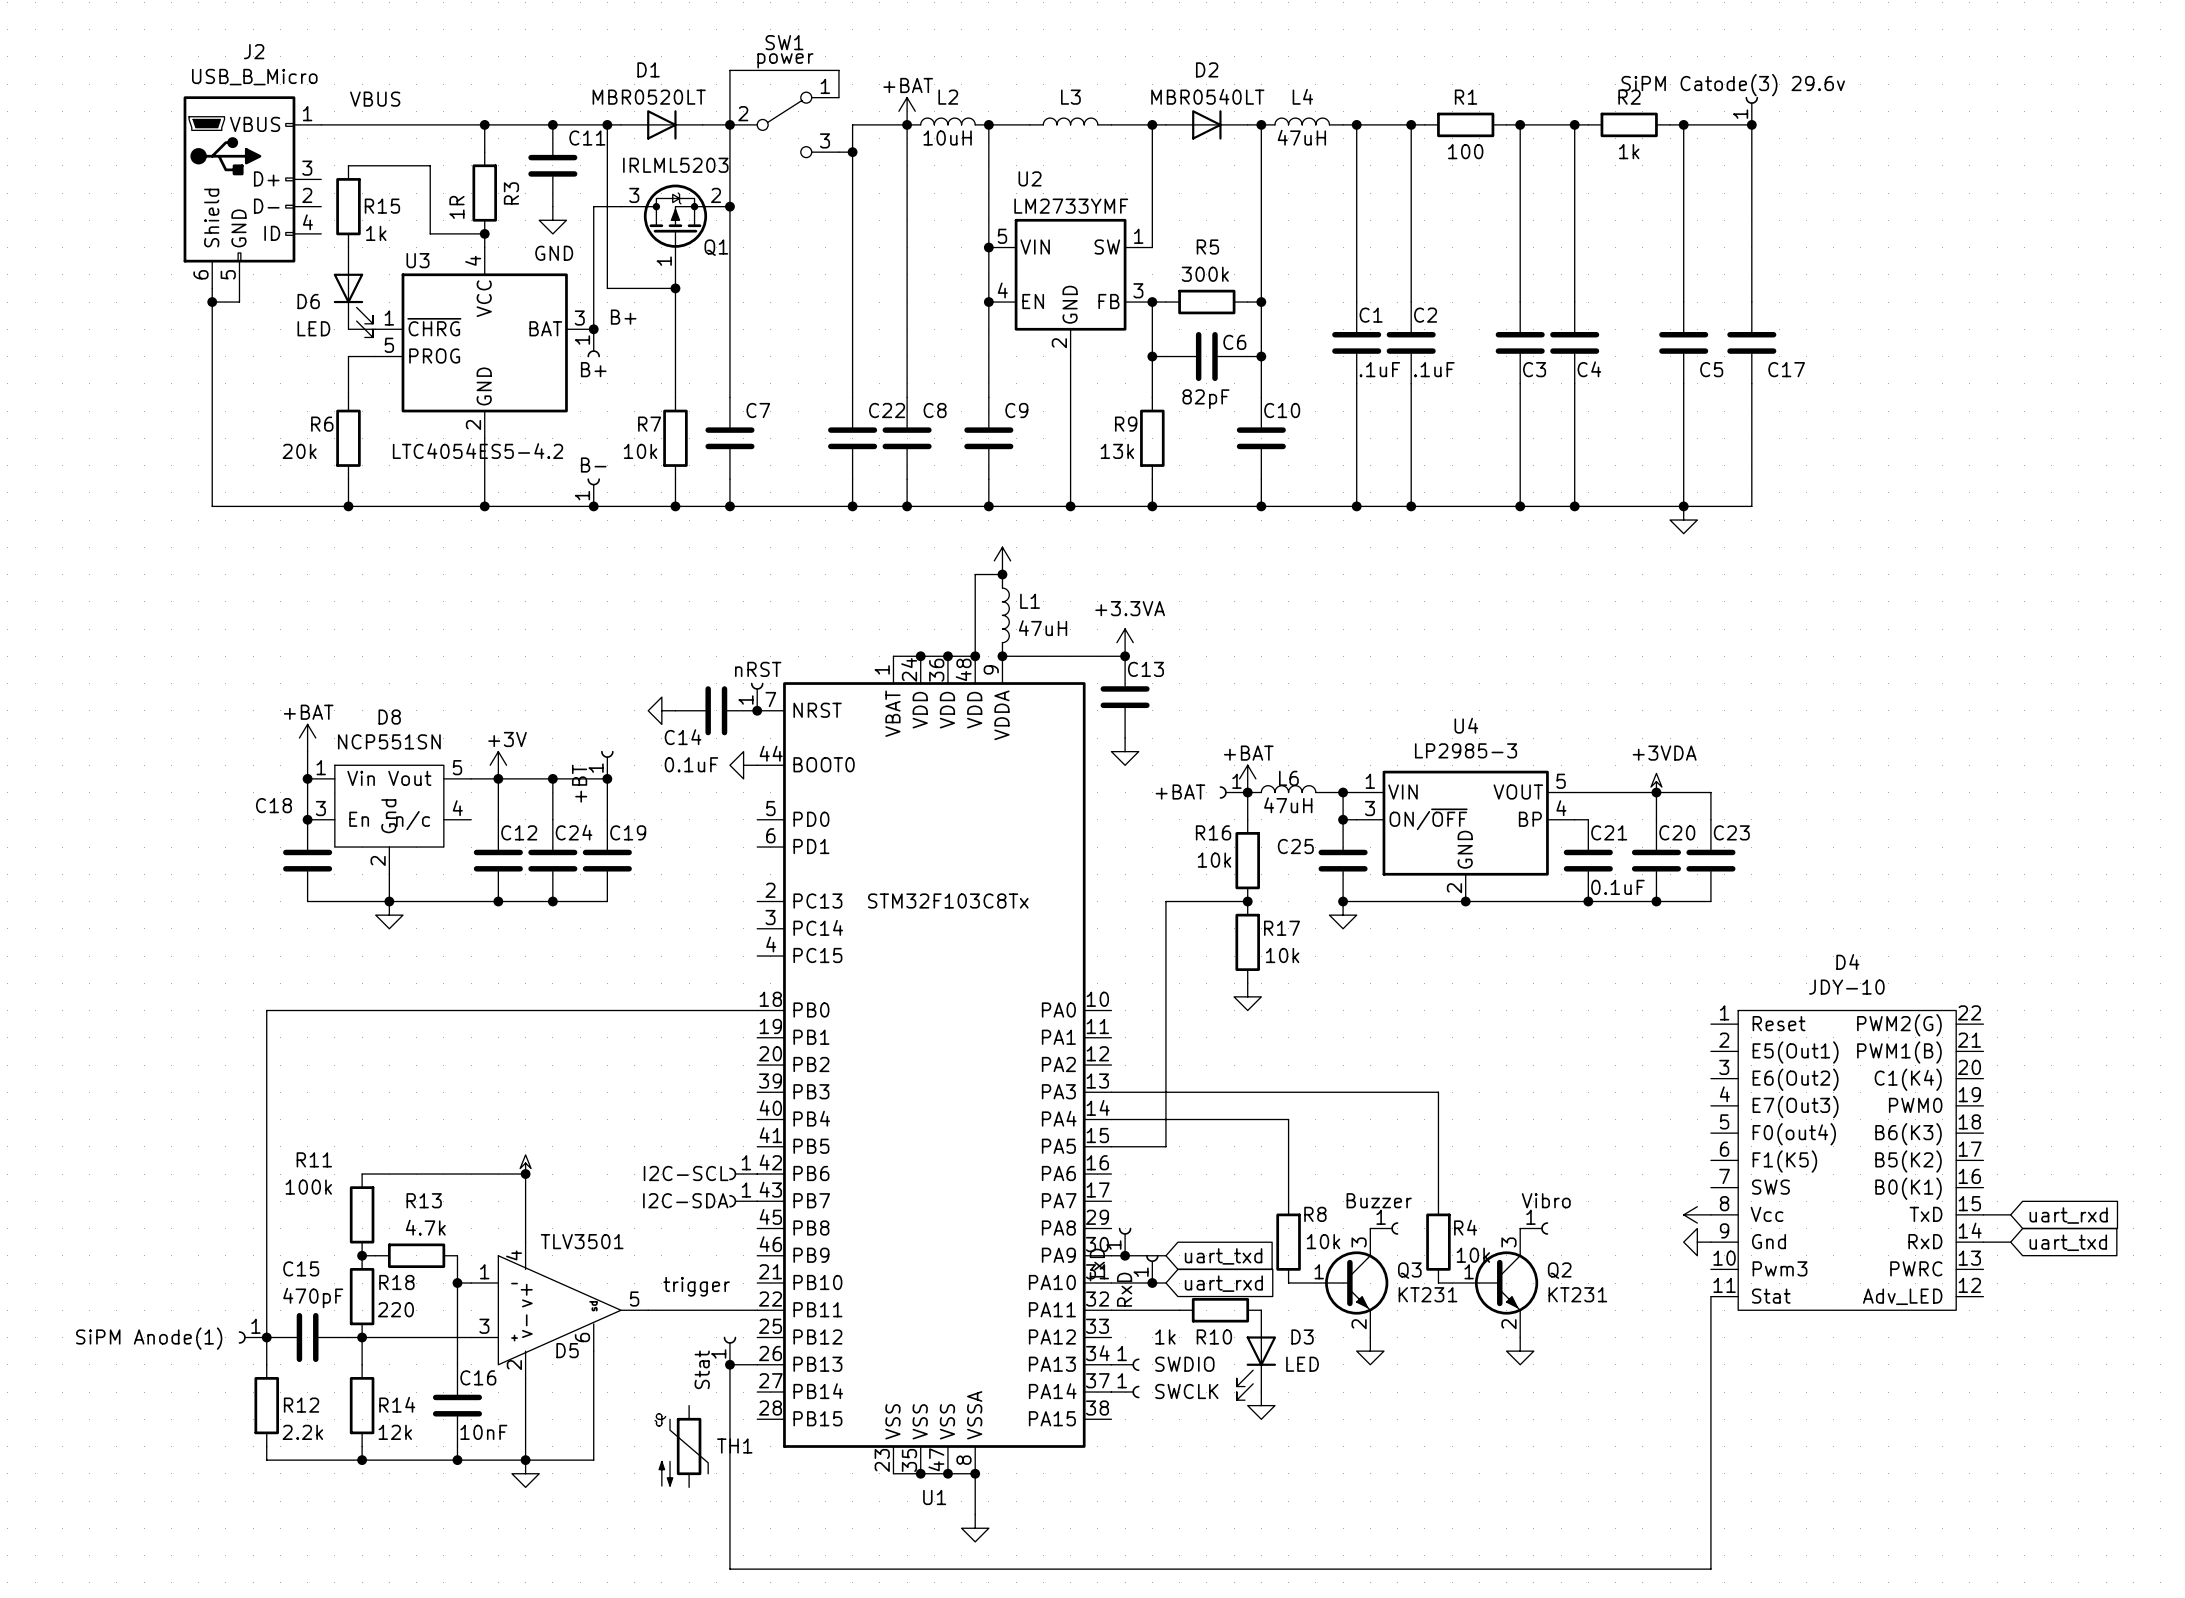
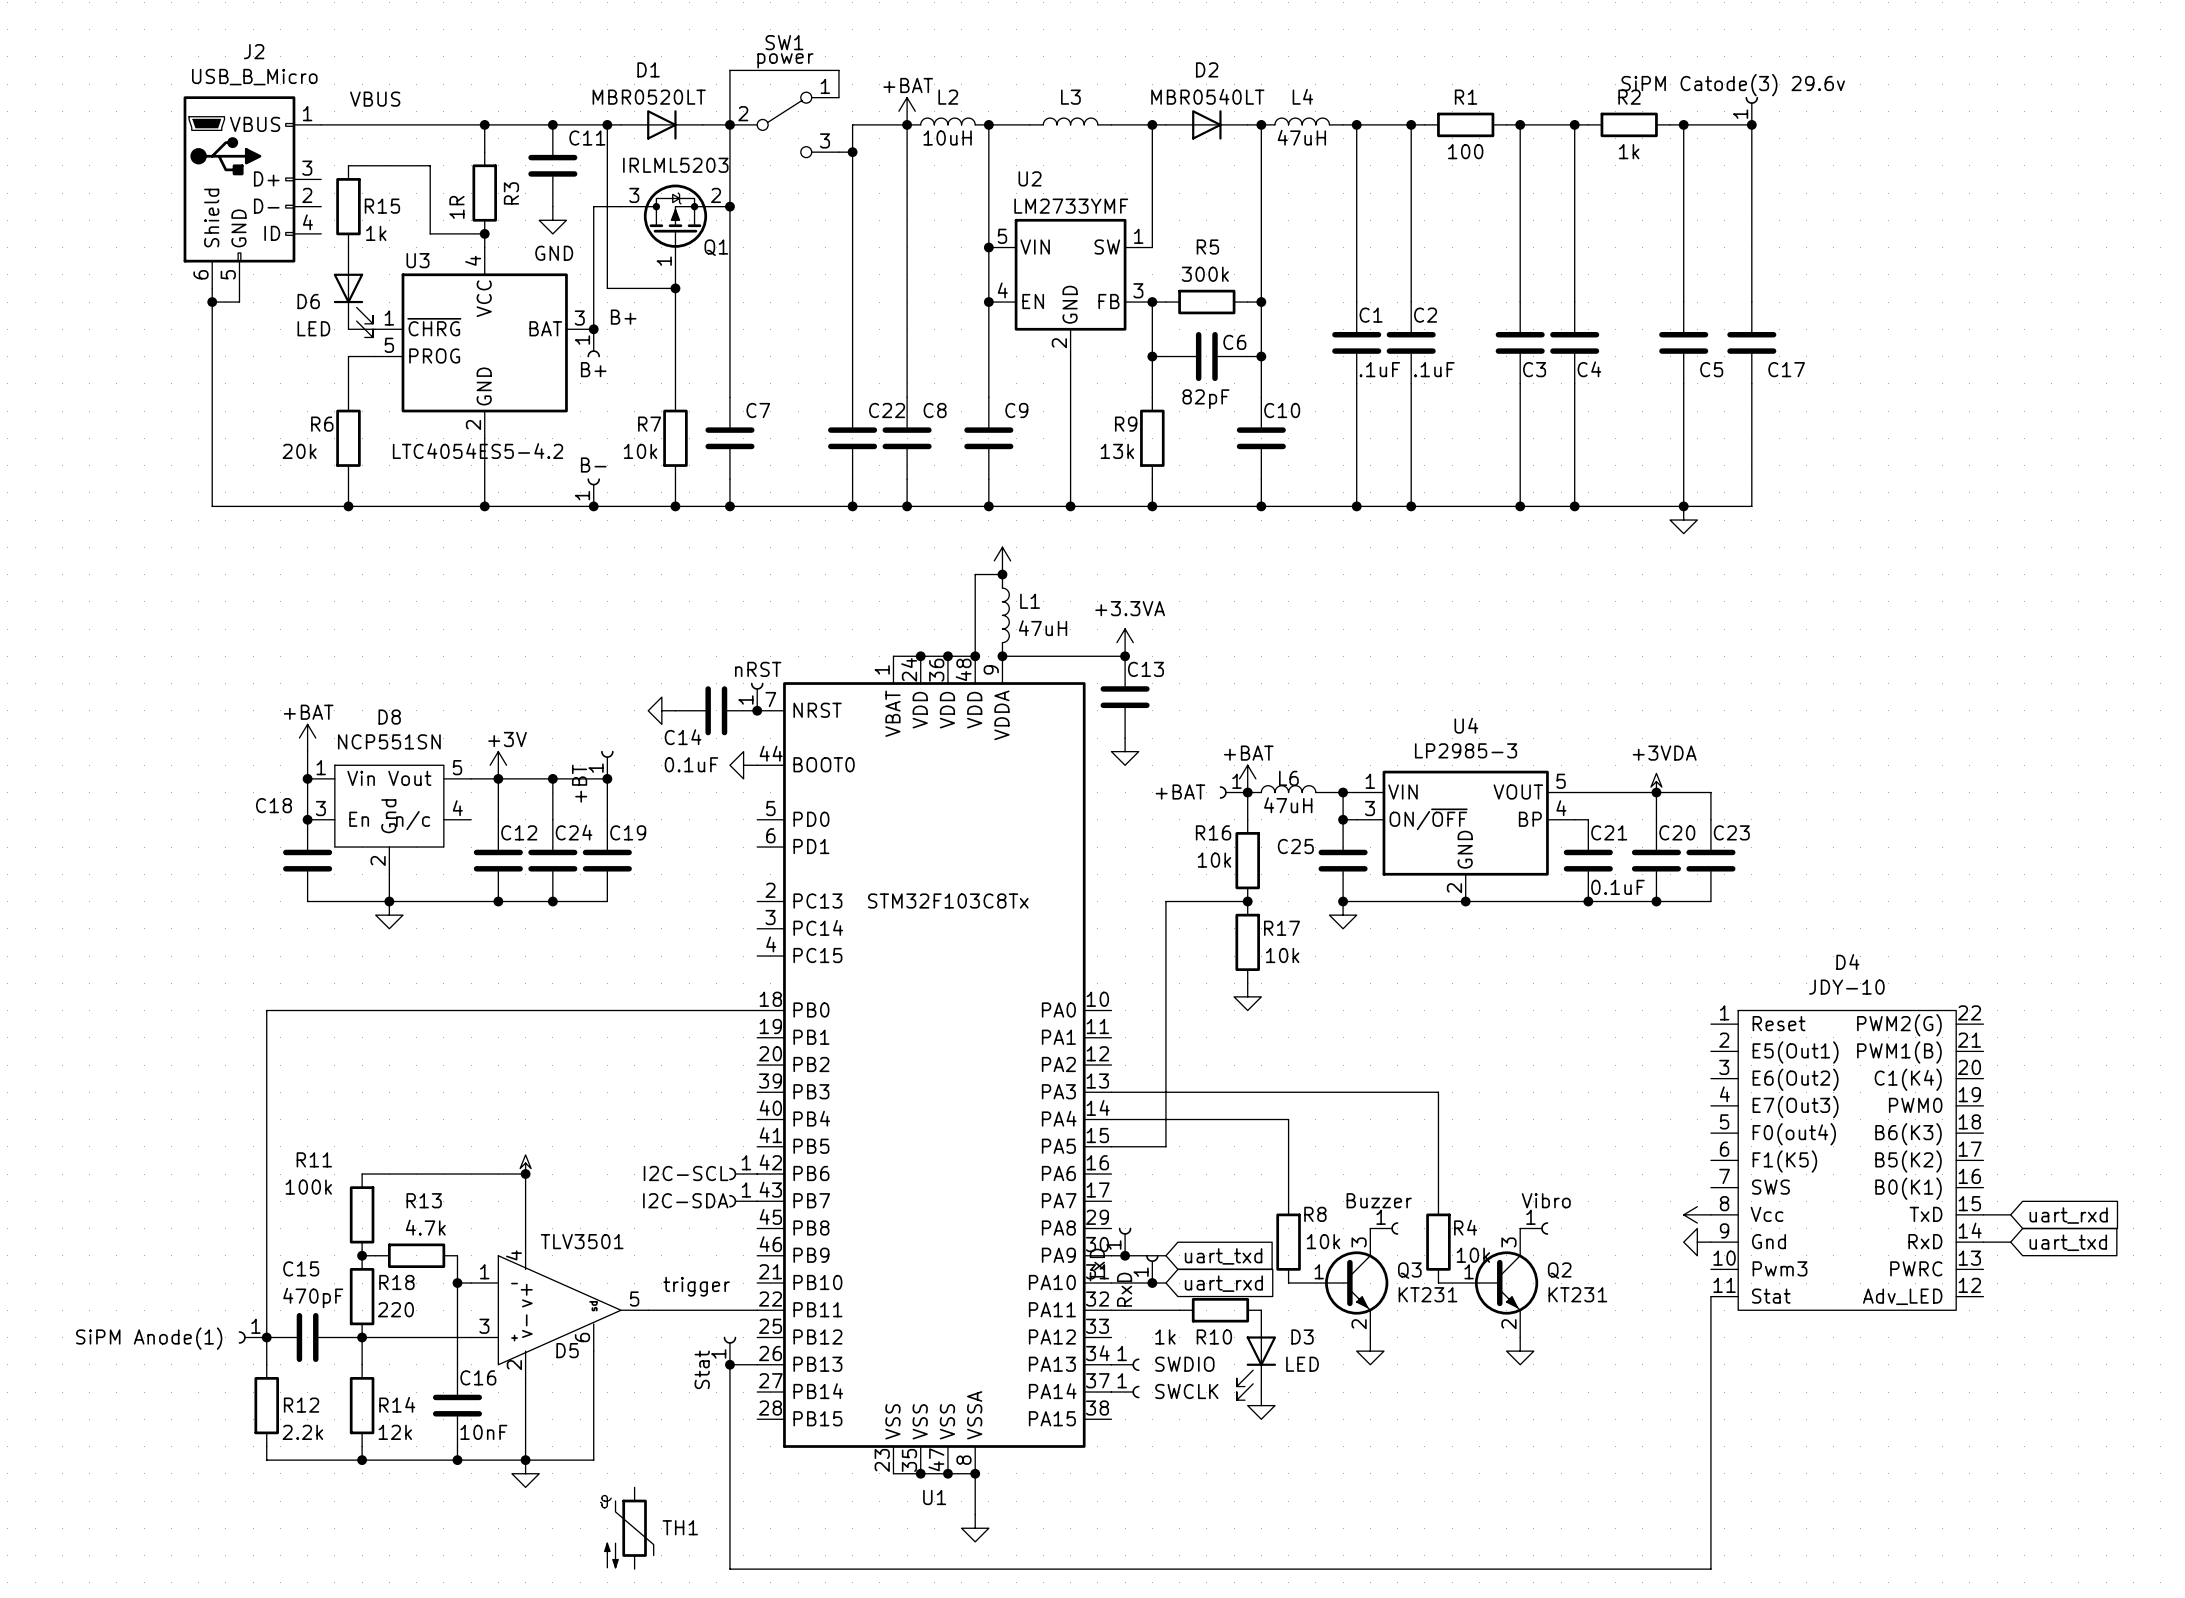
TH1 position: (681, 1446) -> (627, 1528)

